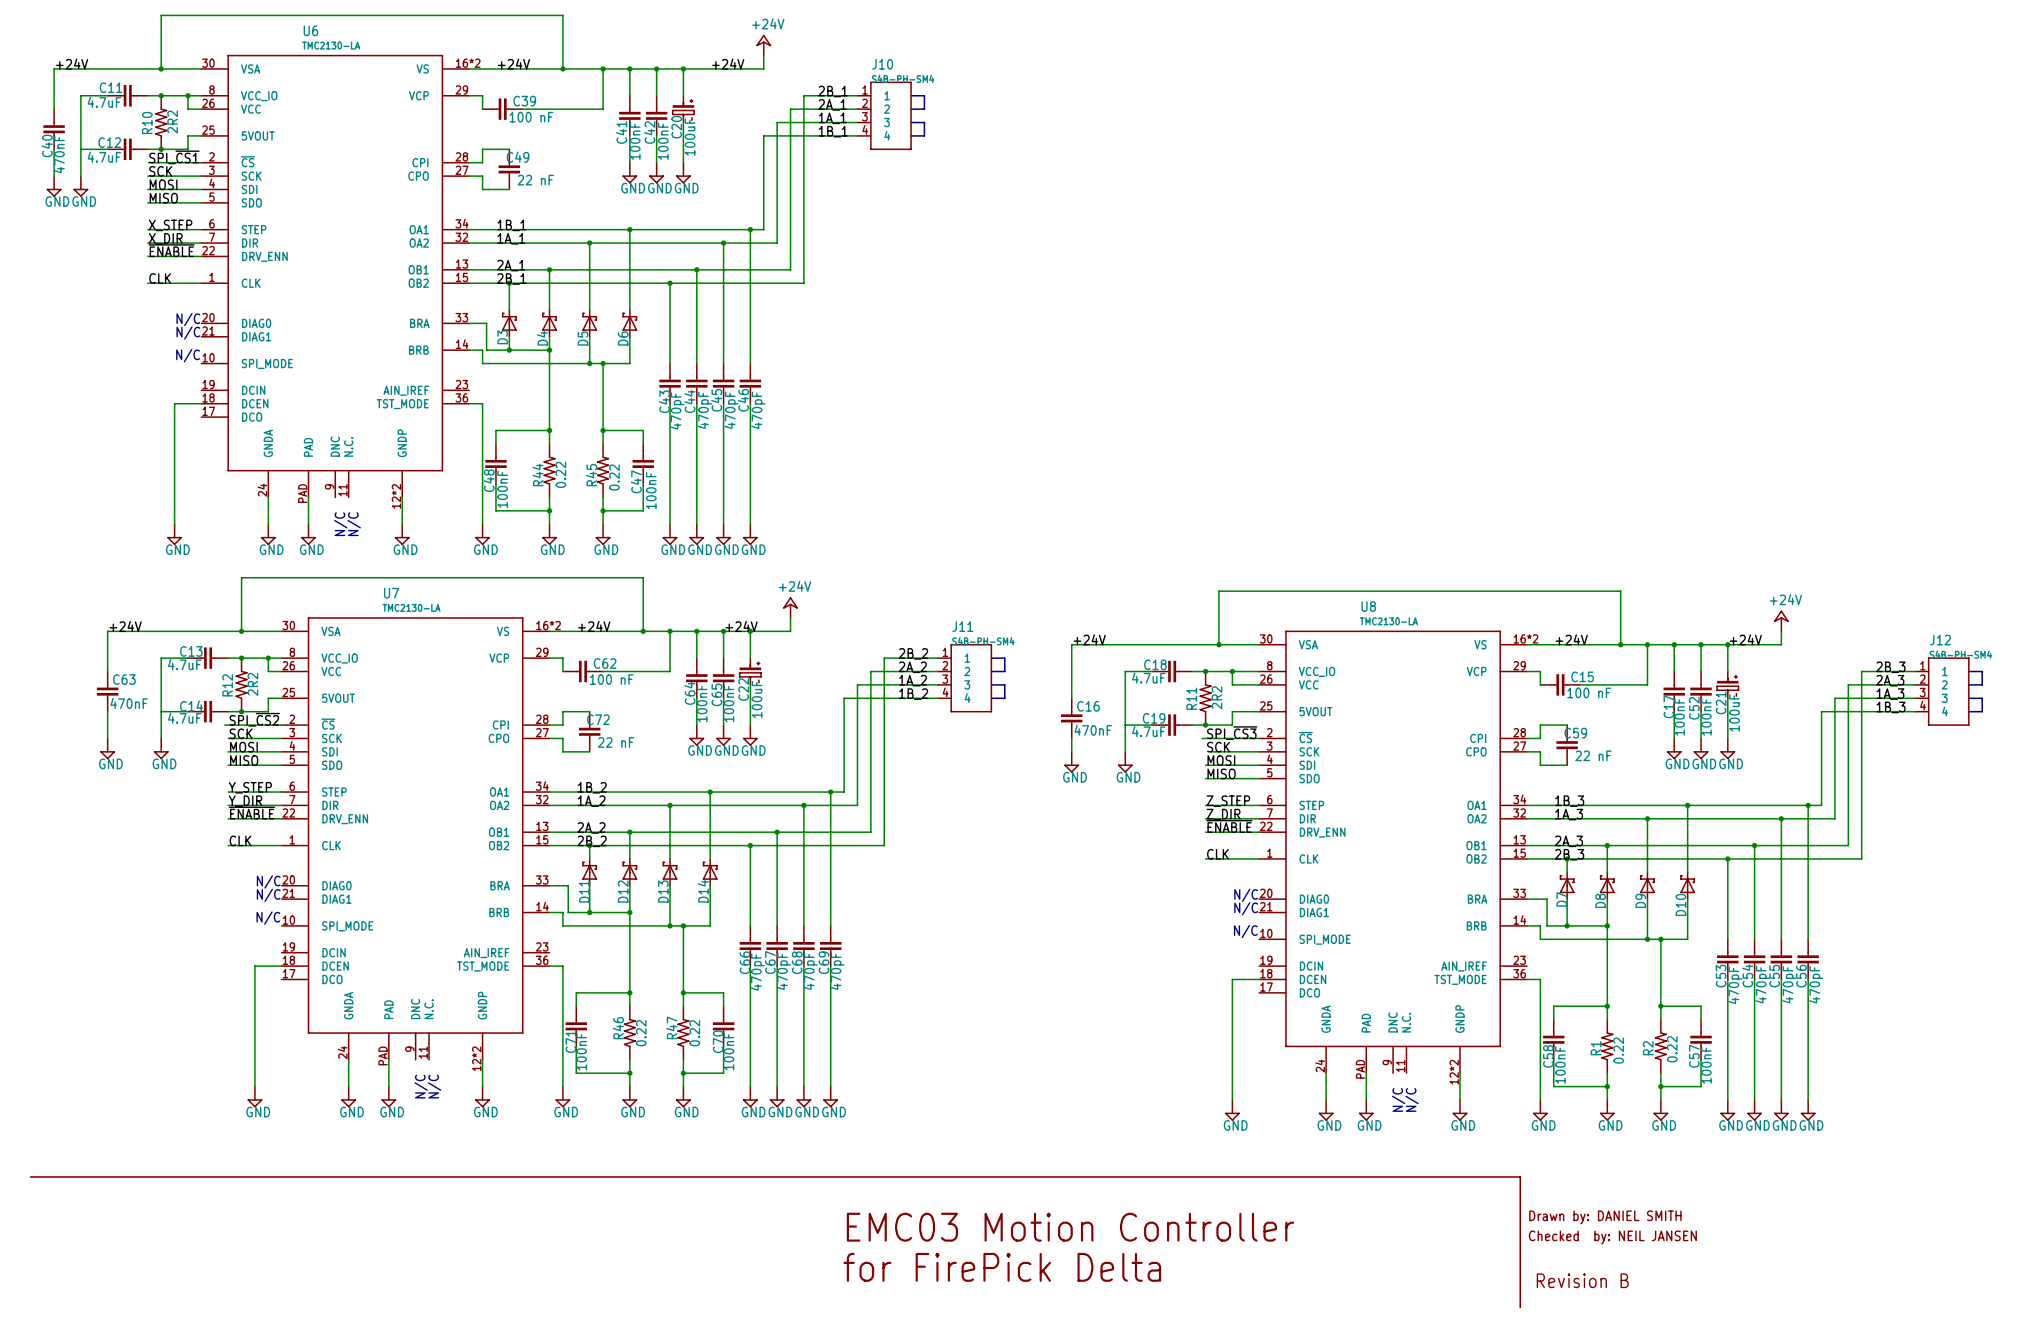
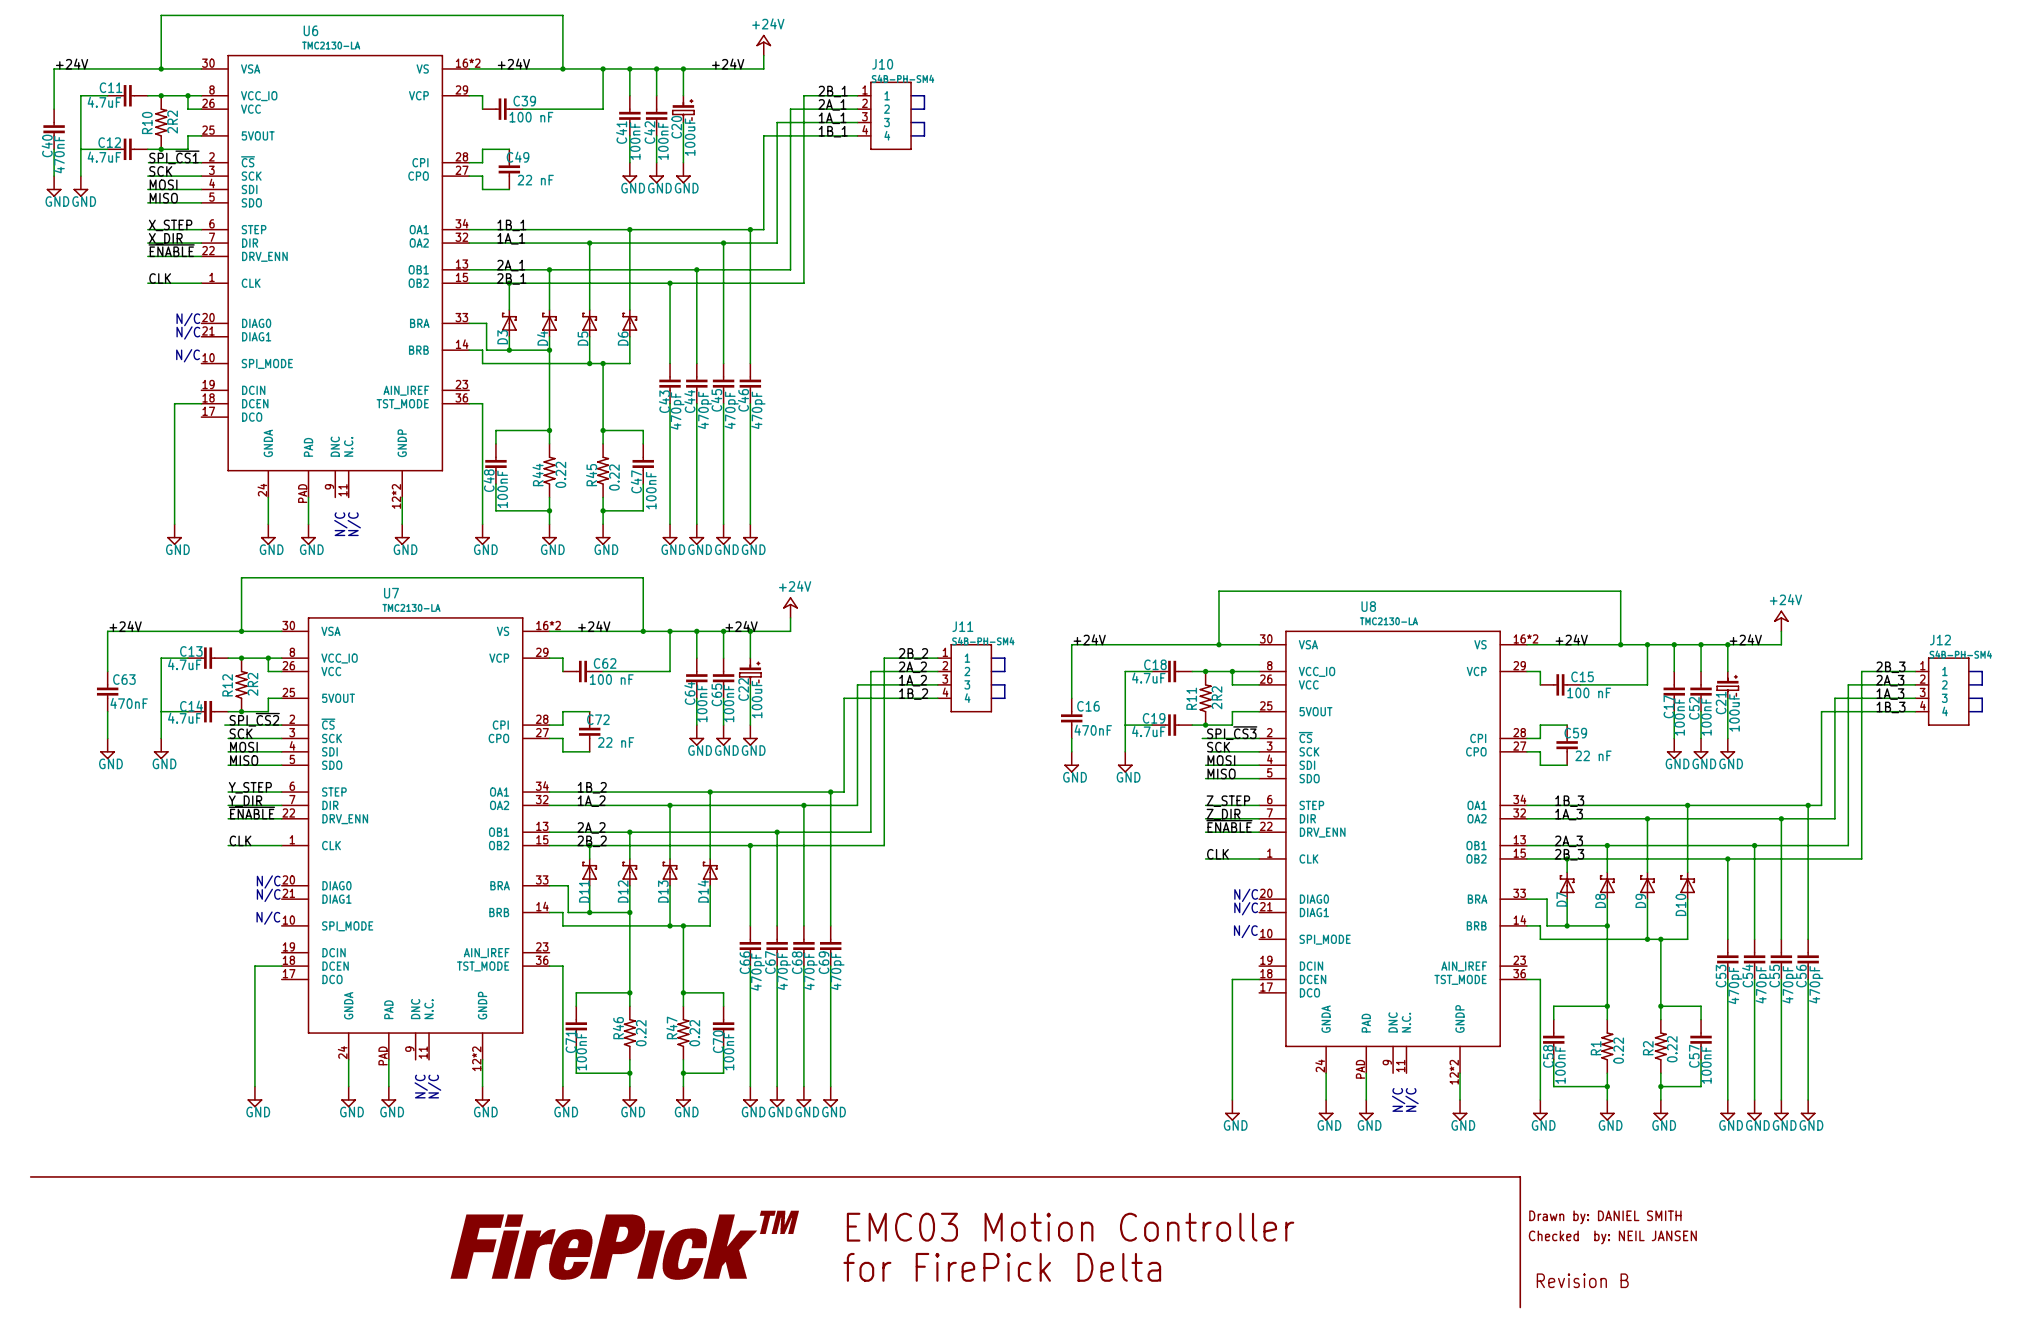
part: none -> (624, 1245)

